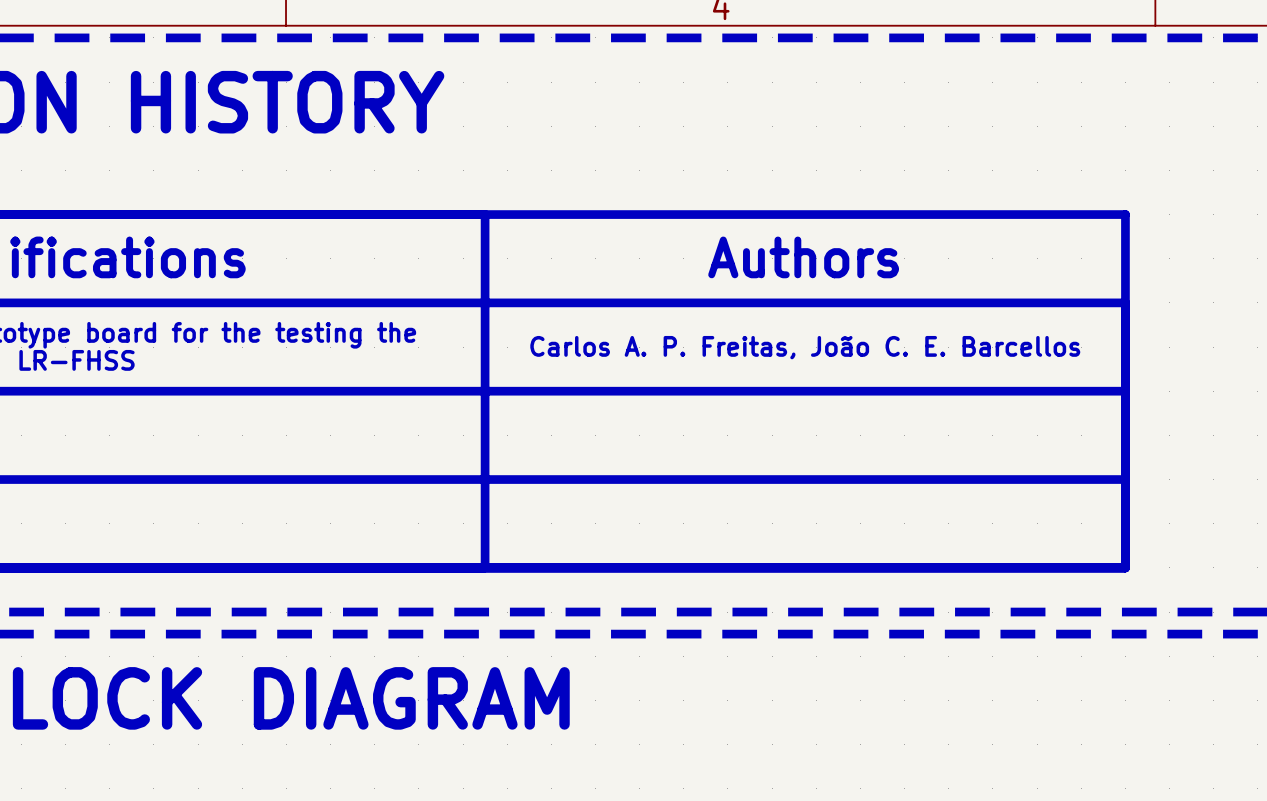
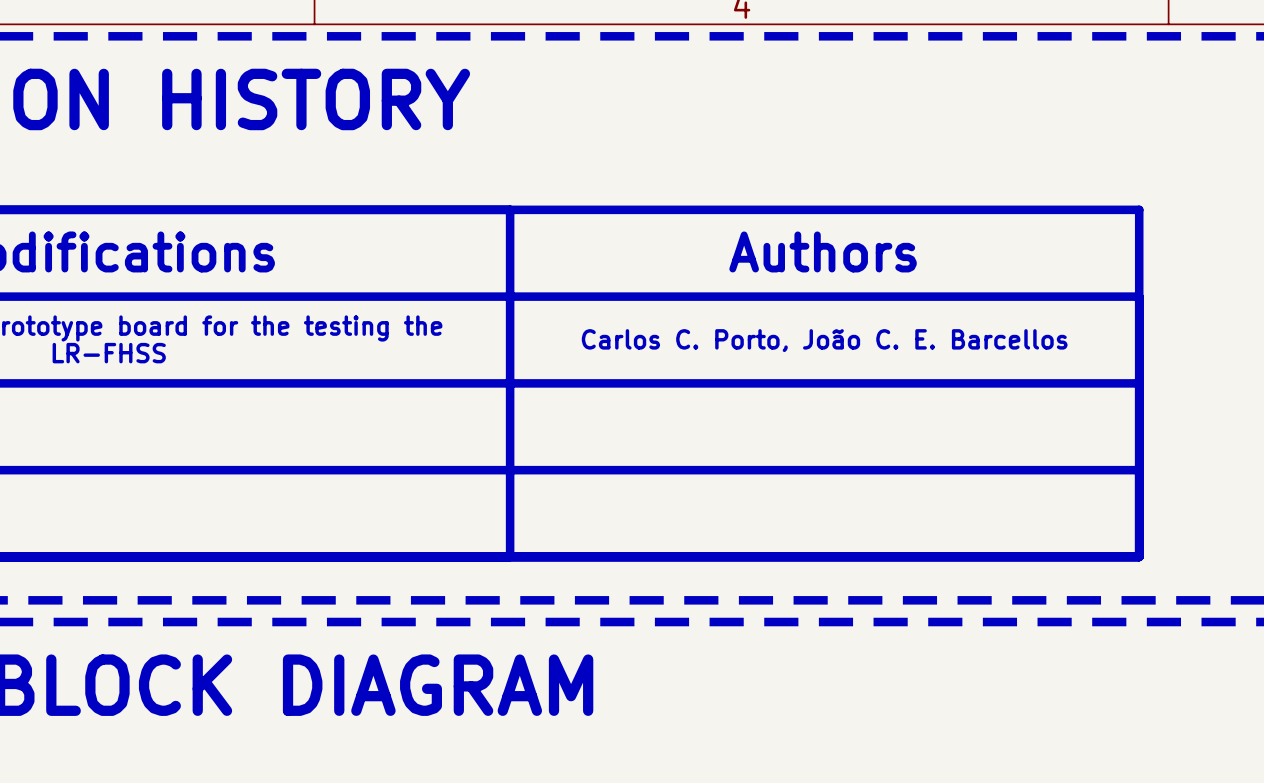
text: Carlos A. P. Freitas, João C. E. Barcellos (805, 347) -> Carlos C. Porto, João C. E. Barcellos (824, 340)

